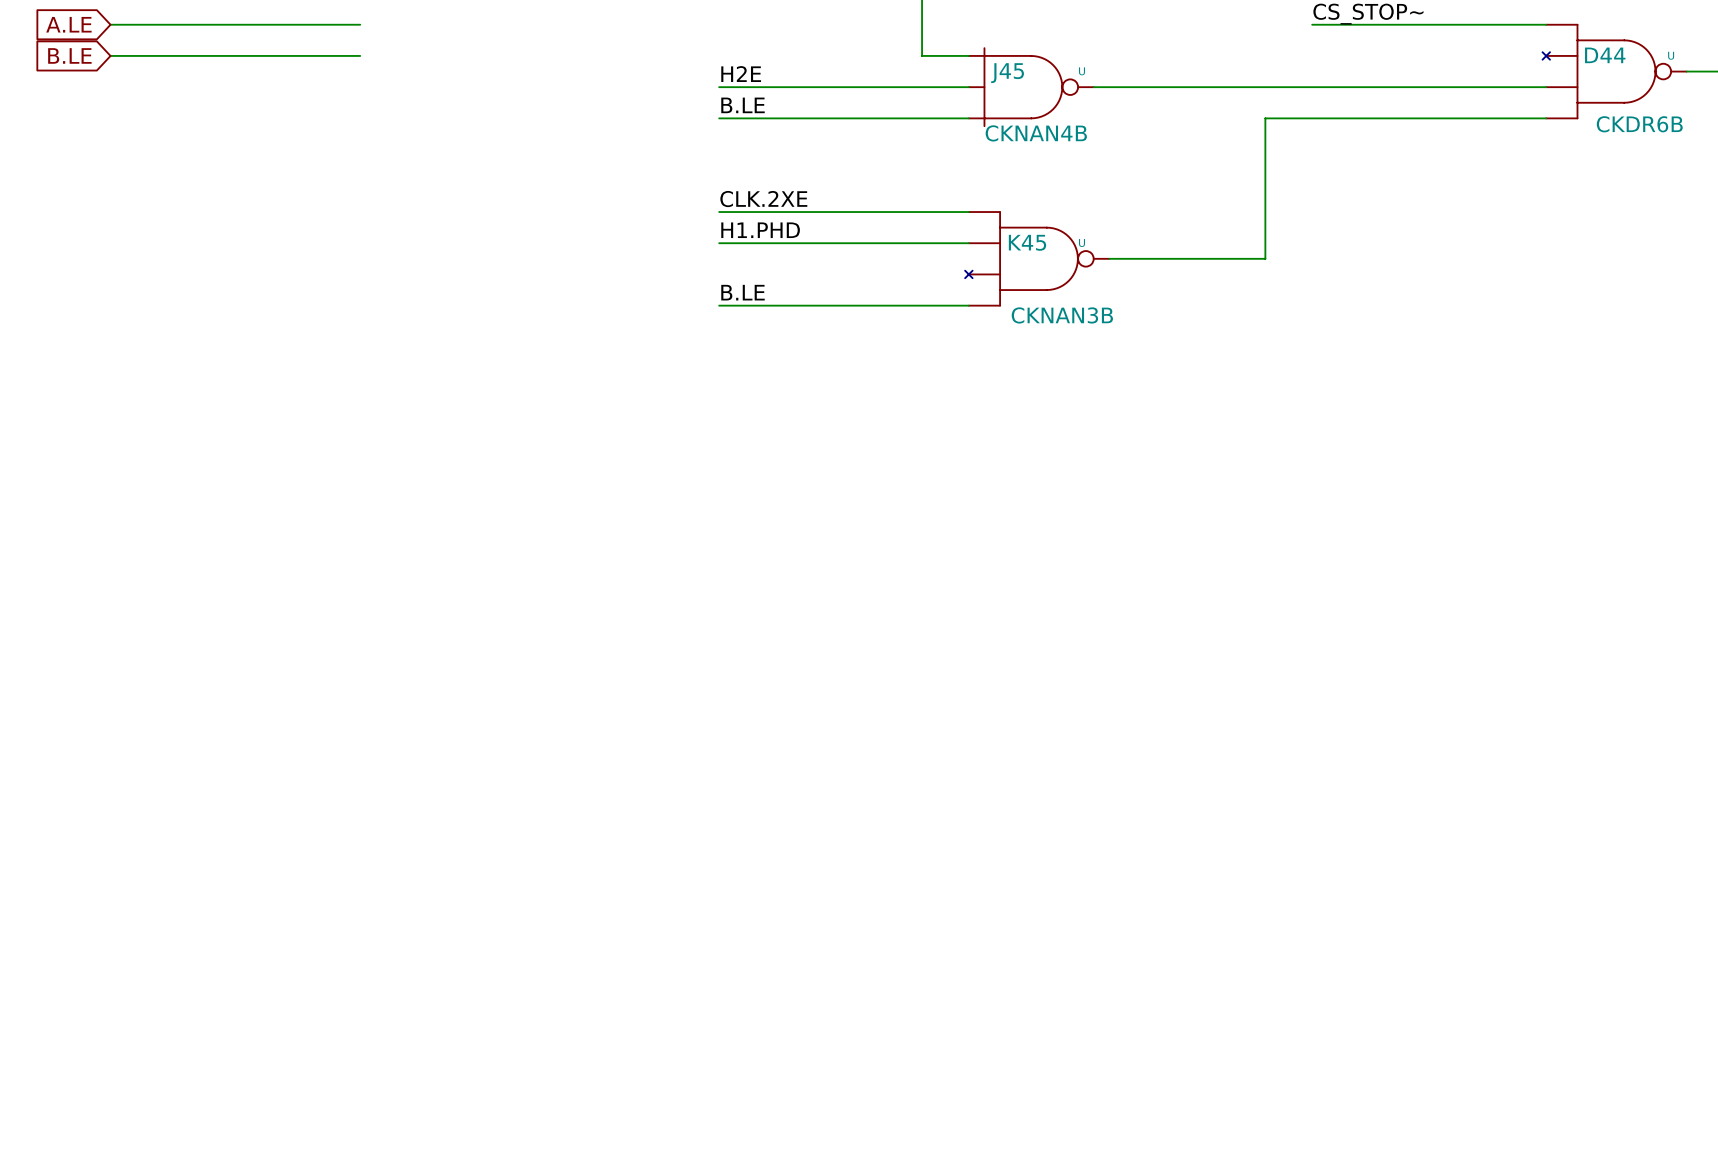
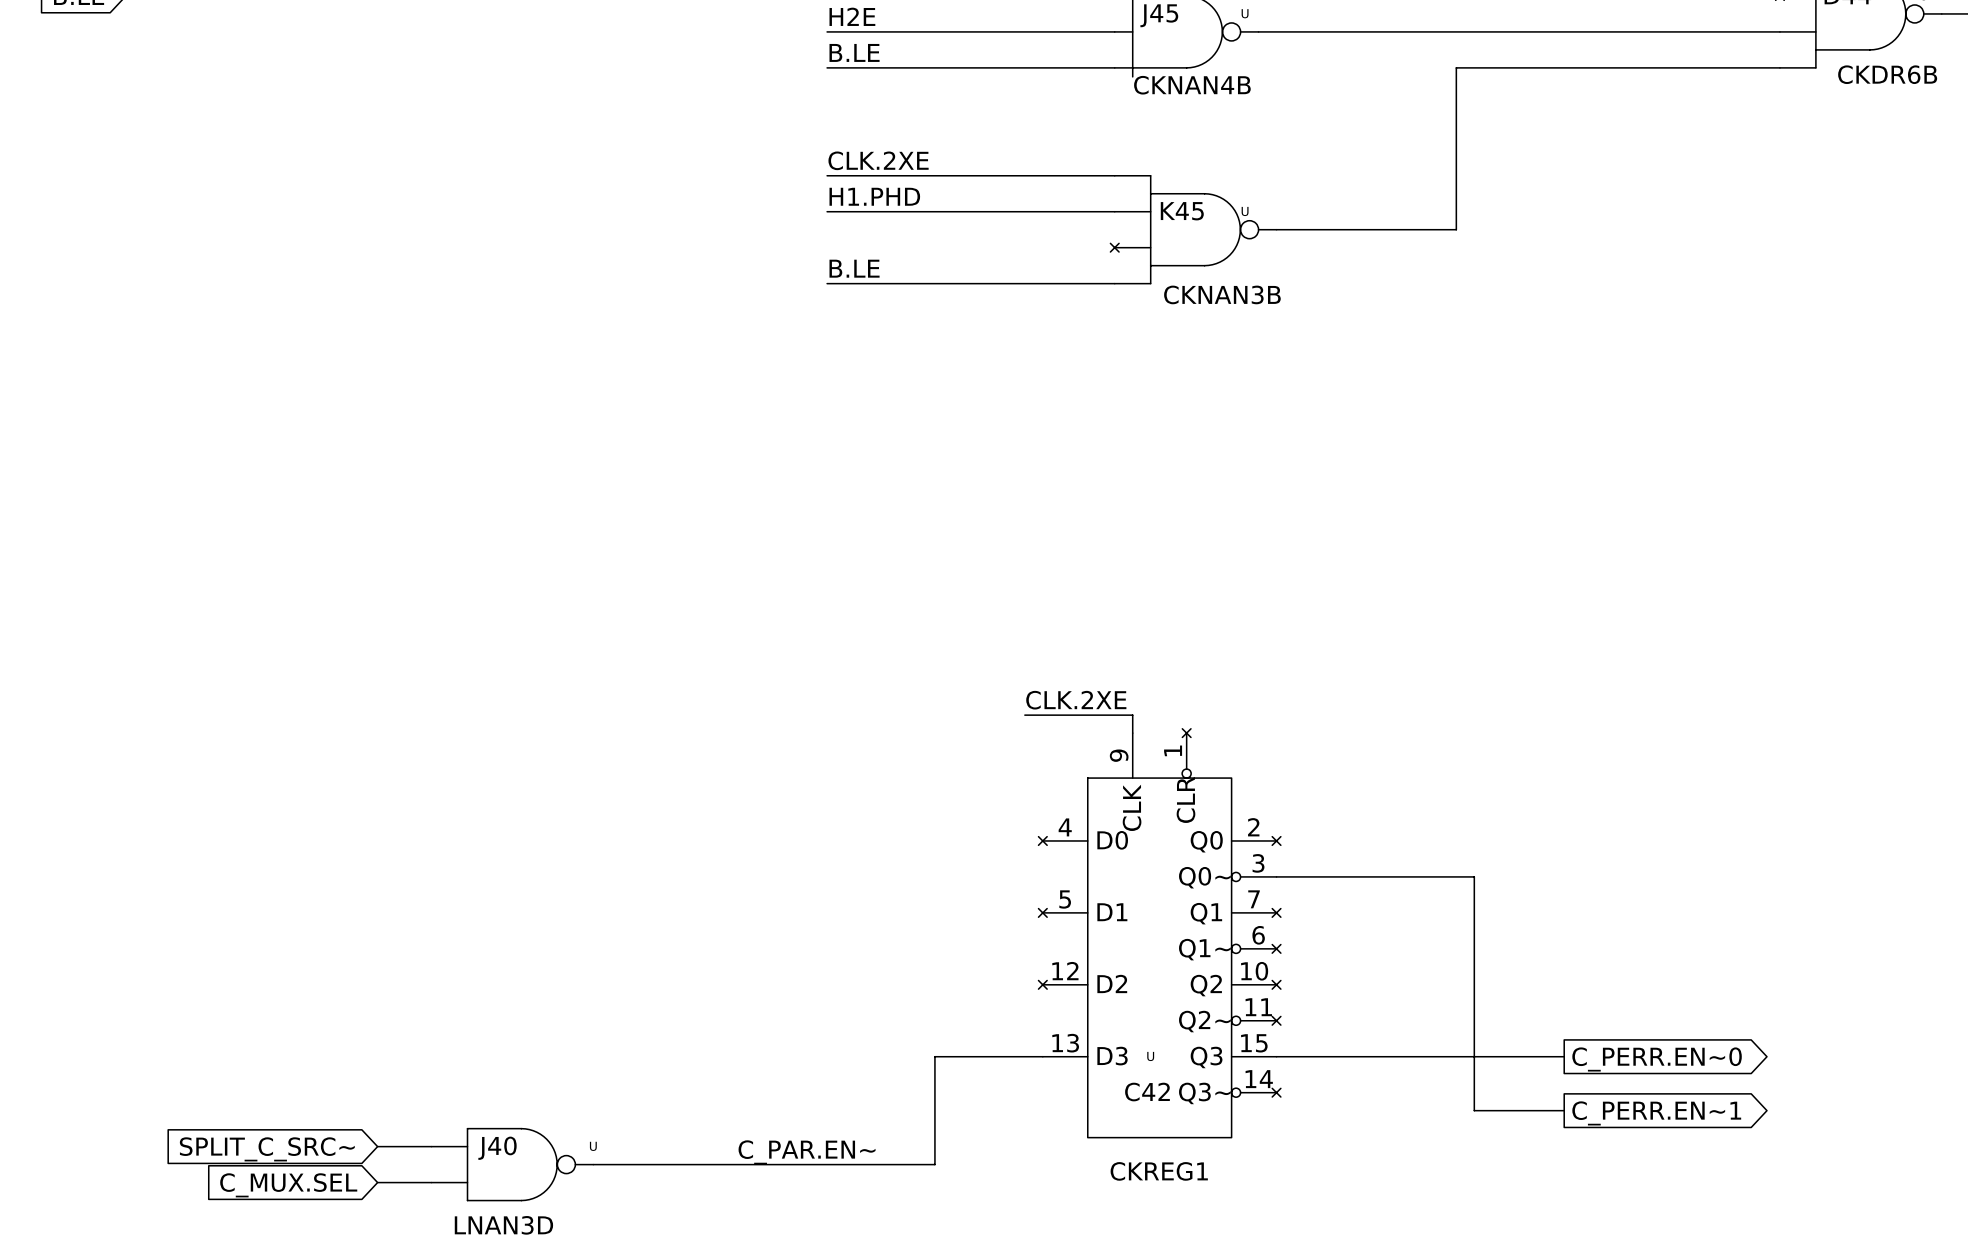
label: none -> CLK.2XE (1076, 700)
wire: none -> (1024, 715) (1132, 715) (1132, 733)
no-connect mark: none -> (1186, 733)
no-connect mark: none -> (1042, 840)
no-connect mark: none -> (1276, 840)
wire: none -> (1276, 876) (1474, 876) (1474, 1110) (1564, 1110)
no-connect mark: none -> (1042, 912)
no-connect mark: none -> (1276, 912)
U: none -> (1159, 935)
no-connect mark: none -> (1276, 948)
no-connect mark: none -> (1042, 984)
no-connect mark: none -> (1276, 984)
no-connect mark: none -> (1276, 1020)
wire: none -> (1042, 1056) (934, 1056) (934, 1164) (593, 1164)
wire: none -> (1276, 1056) (1564, 1056)
global label: none -> C_PERR.EN~0 (1657, 1059)
no-connect mark: none -> (1276, 1092)
global label: none -> C_PERR.EN~1 (1656, 1113)
wire: none -> (377, 1146) (431, 1146)
global label: none -> SPLIT_C_SRC~ (267, 1149)
label: none -> C_PAR.EN~ (807, 1152)
U: none -> (512, 1164)
wire: none -> (377, 1182) (431, 1182)
global label: none -> C_MUX.SEL (288, 1185)

